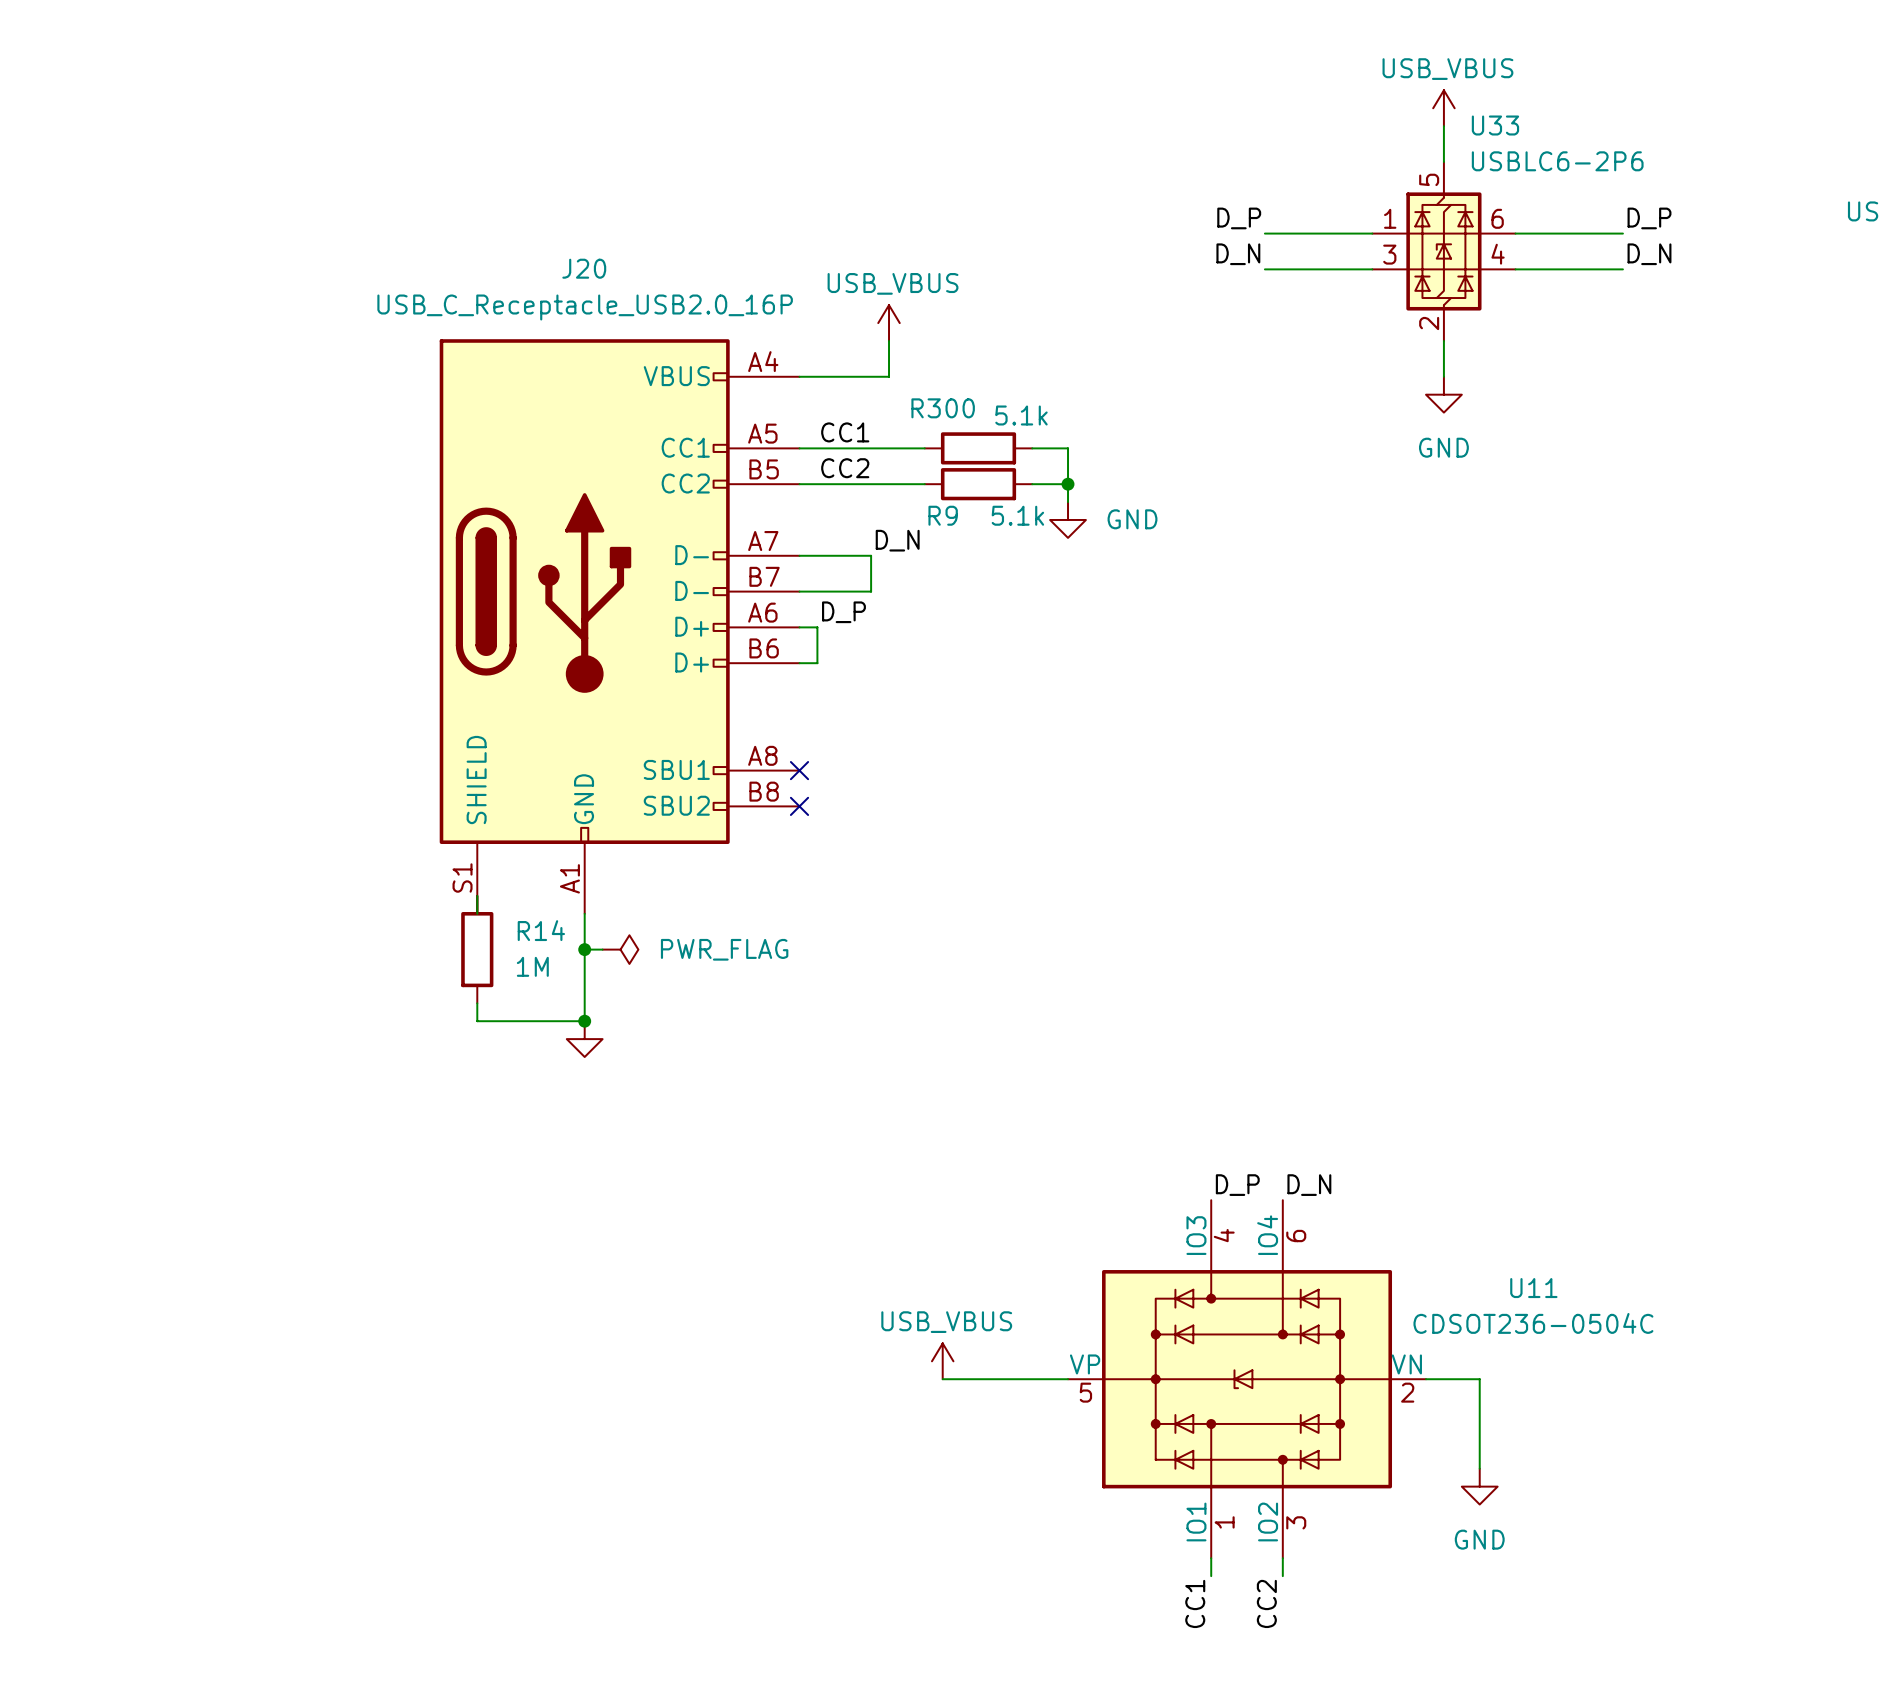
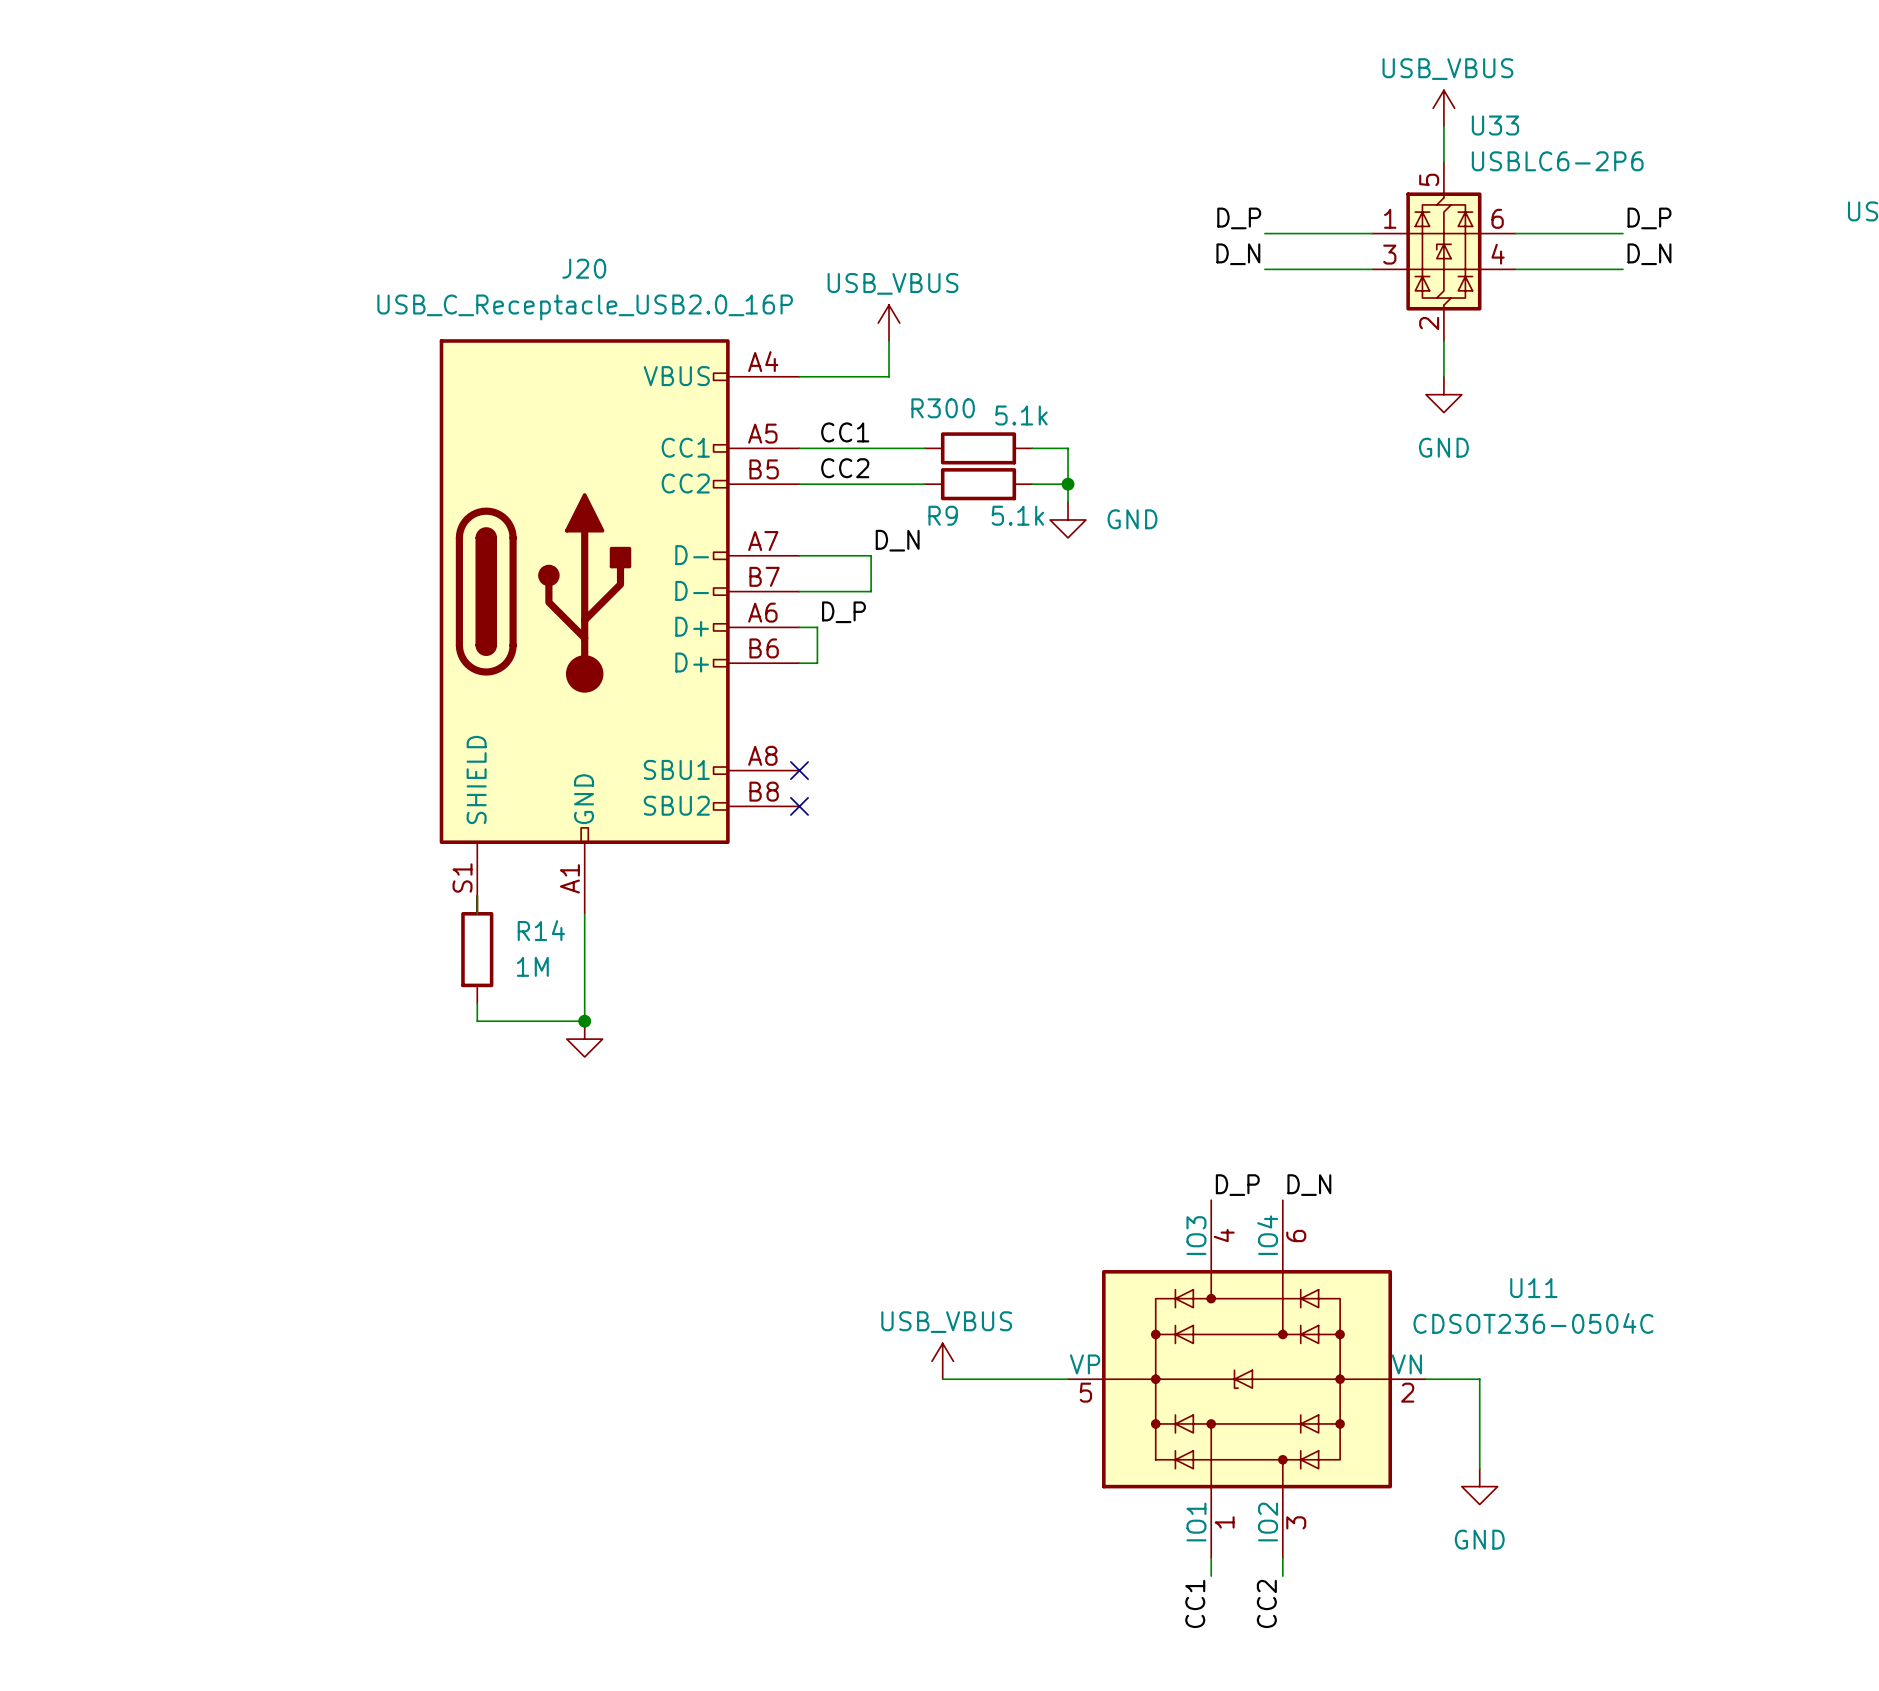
wire: (584, 949) (602, 949) -> none
junction: (584, 949) -> none
power symbol: PWR_FLAG (620, 949) -> none

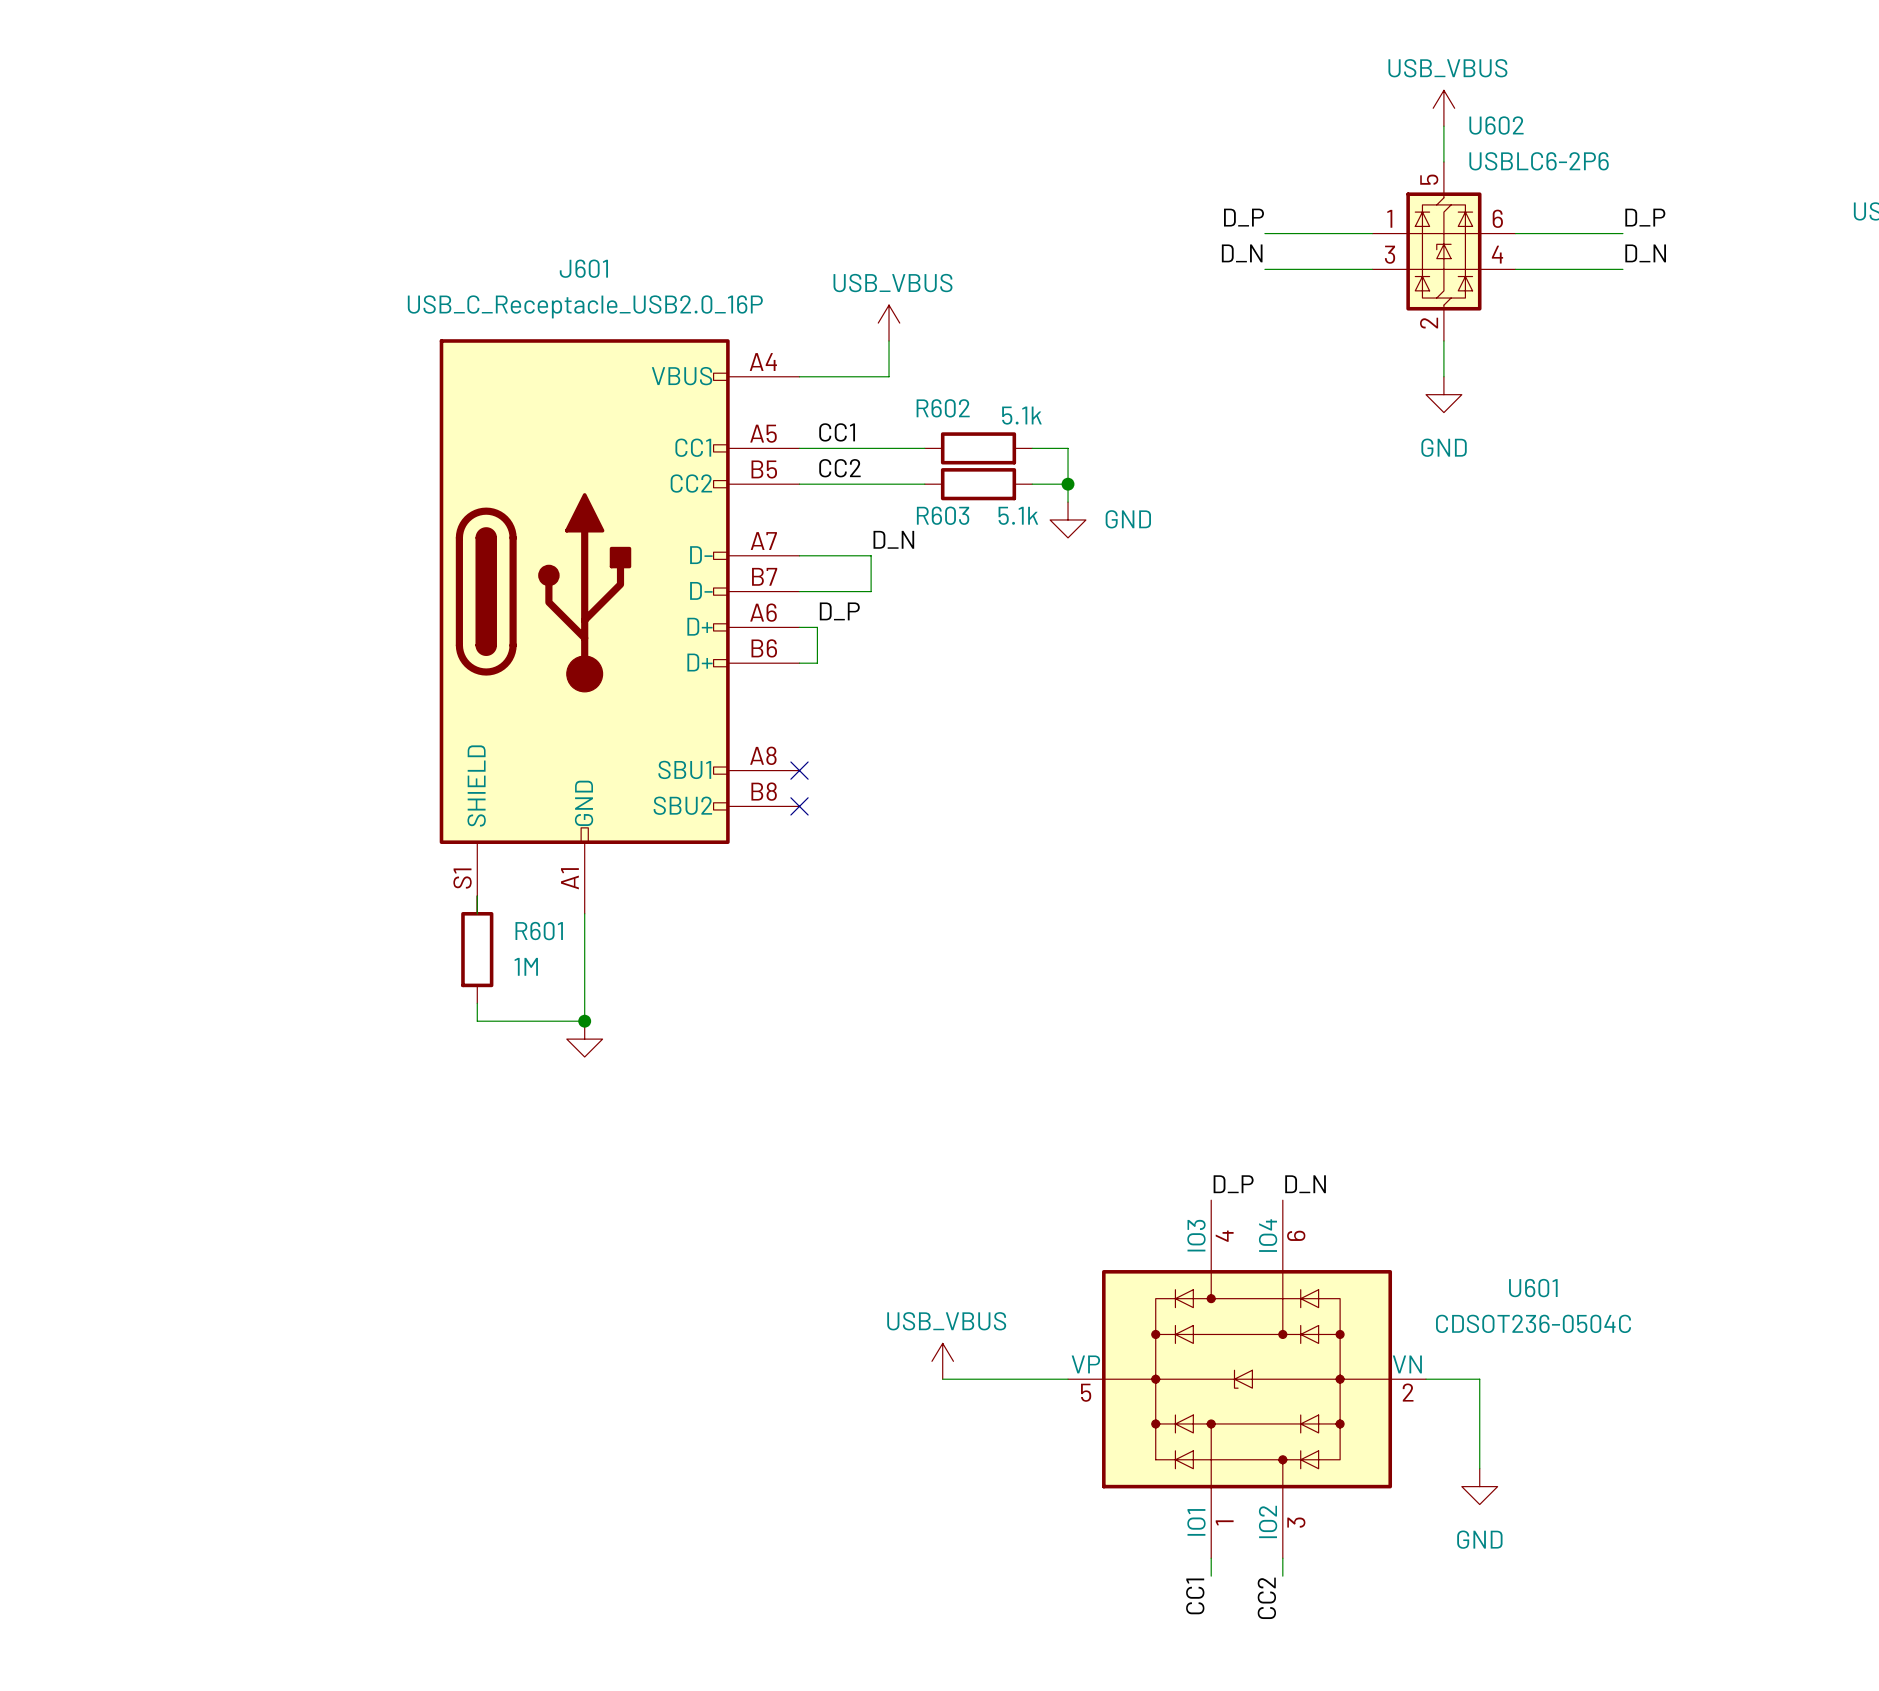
U33 name: U33 (1495, 125) -> U602 (1496, 125)
J20 name: J20 (584, 268) -> J601 (583, 268)
R300 name: R300 (943, 408) -> R602 (943, 408)
R9 name: R9 (943, 515) -> R603 (943, 515)
R14 name: R14 (541, 930) -> R601 (539, 931)
U11 name: U11 (1533, 1288) -> U601 (1533, 1288)

